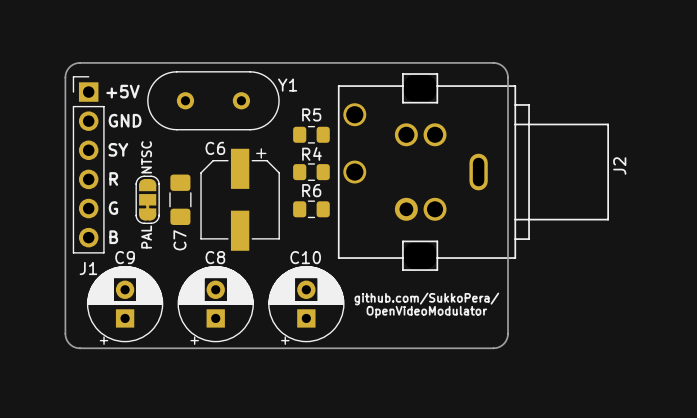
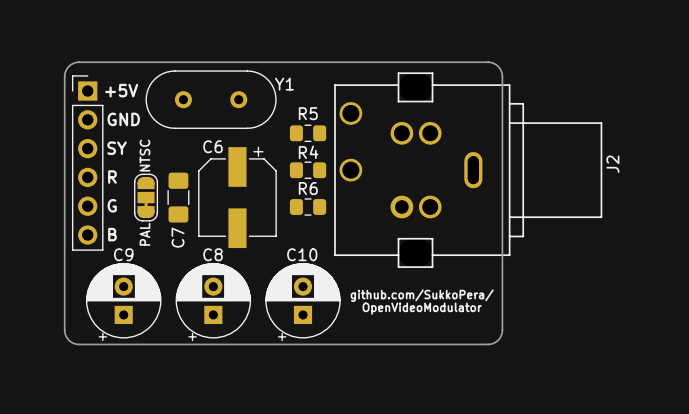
J1 name: J1 (88, 268) -> none

